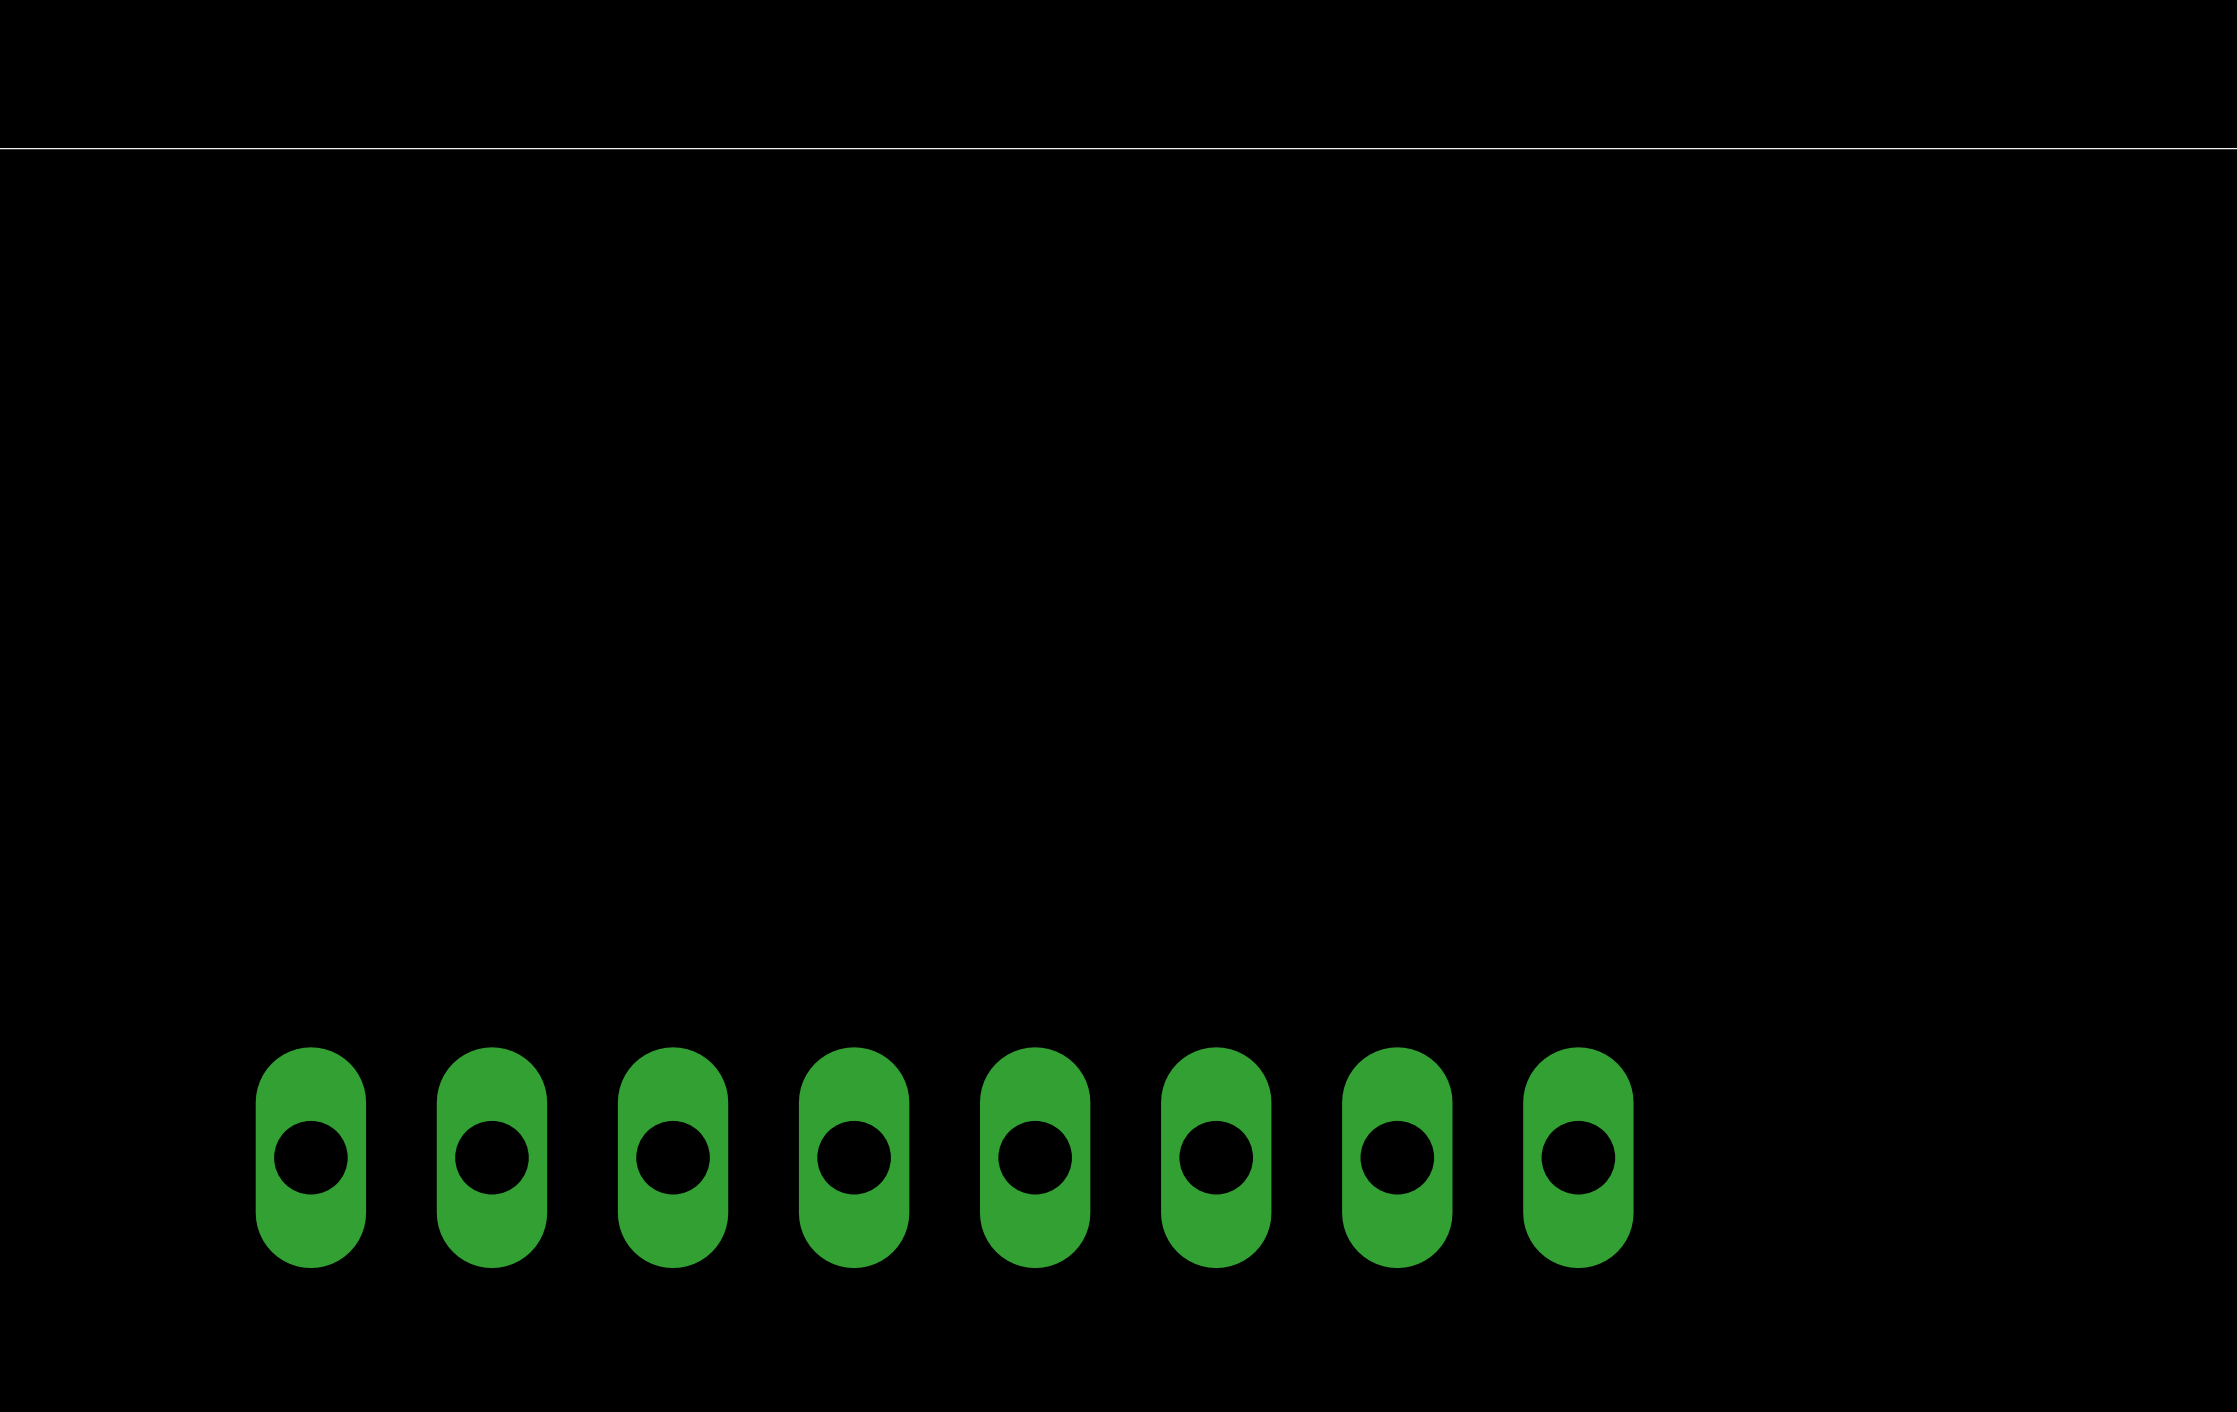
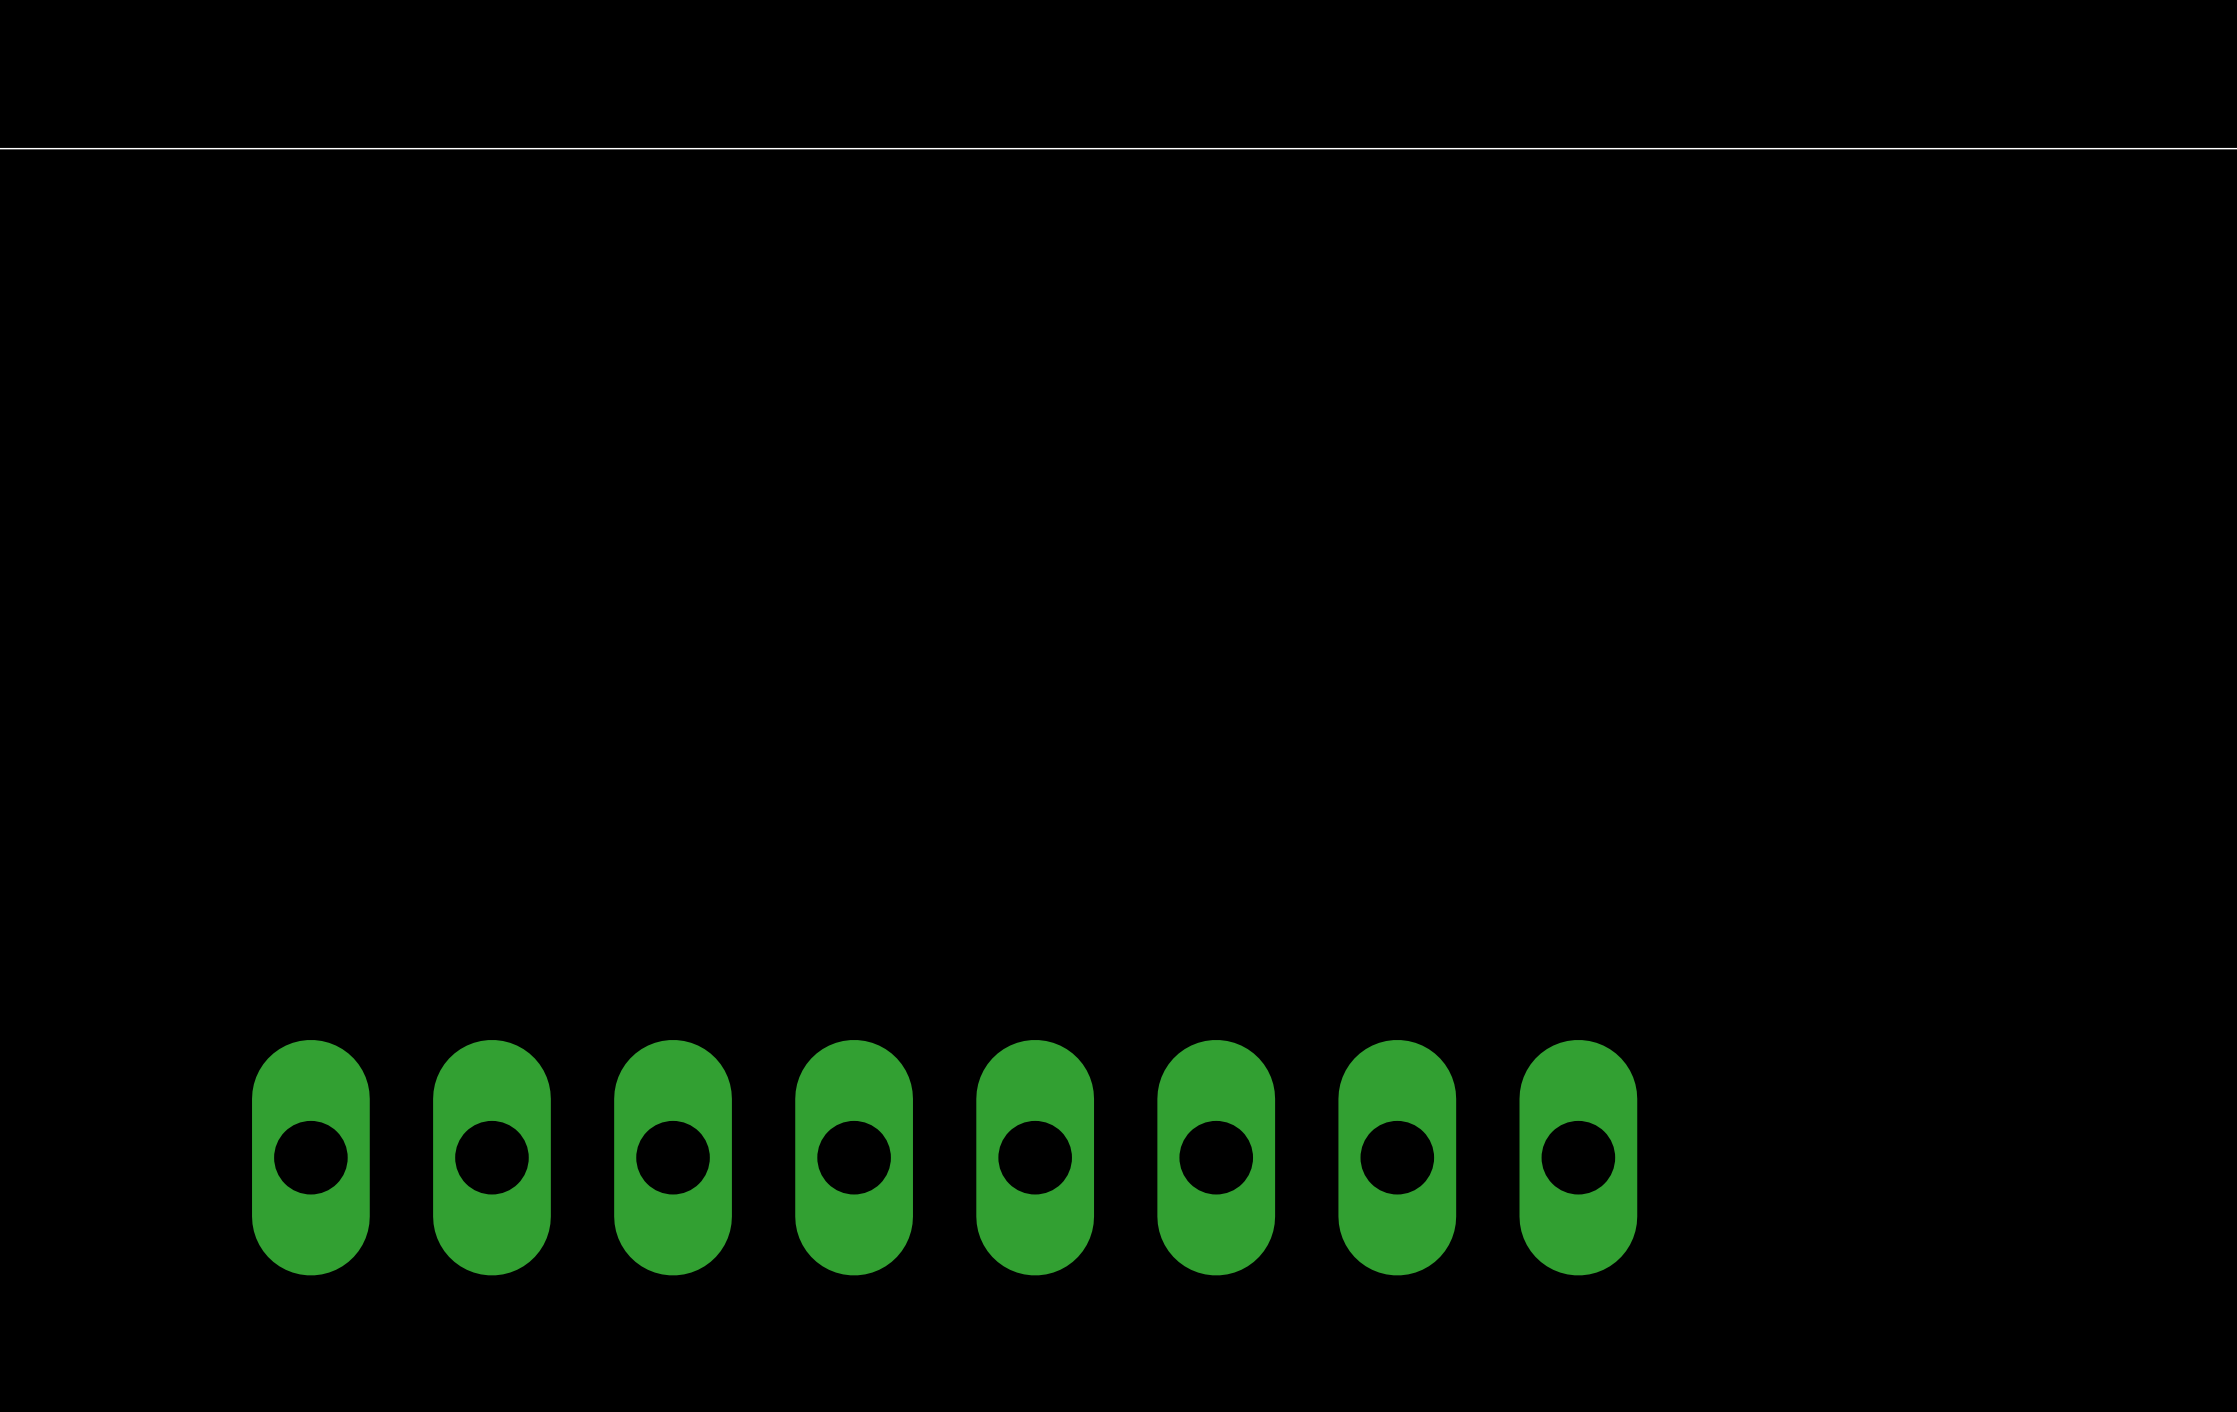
part footprint: [255, 1047, 1634, 1269] -> [252, 1039, 1638, 1276]

